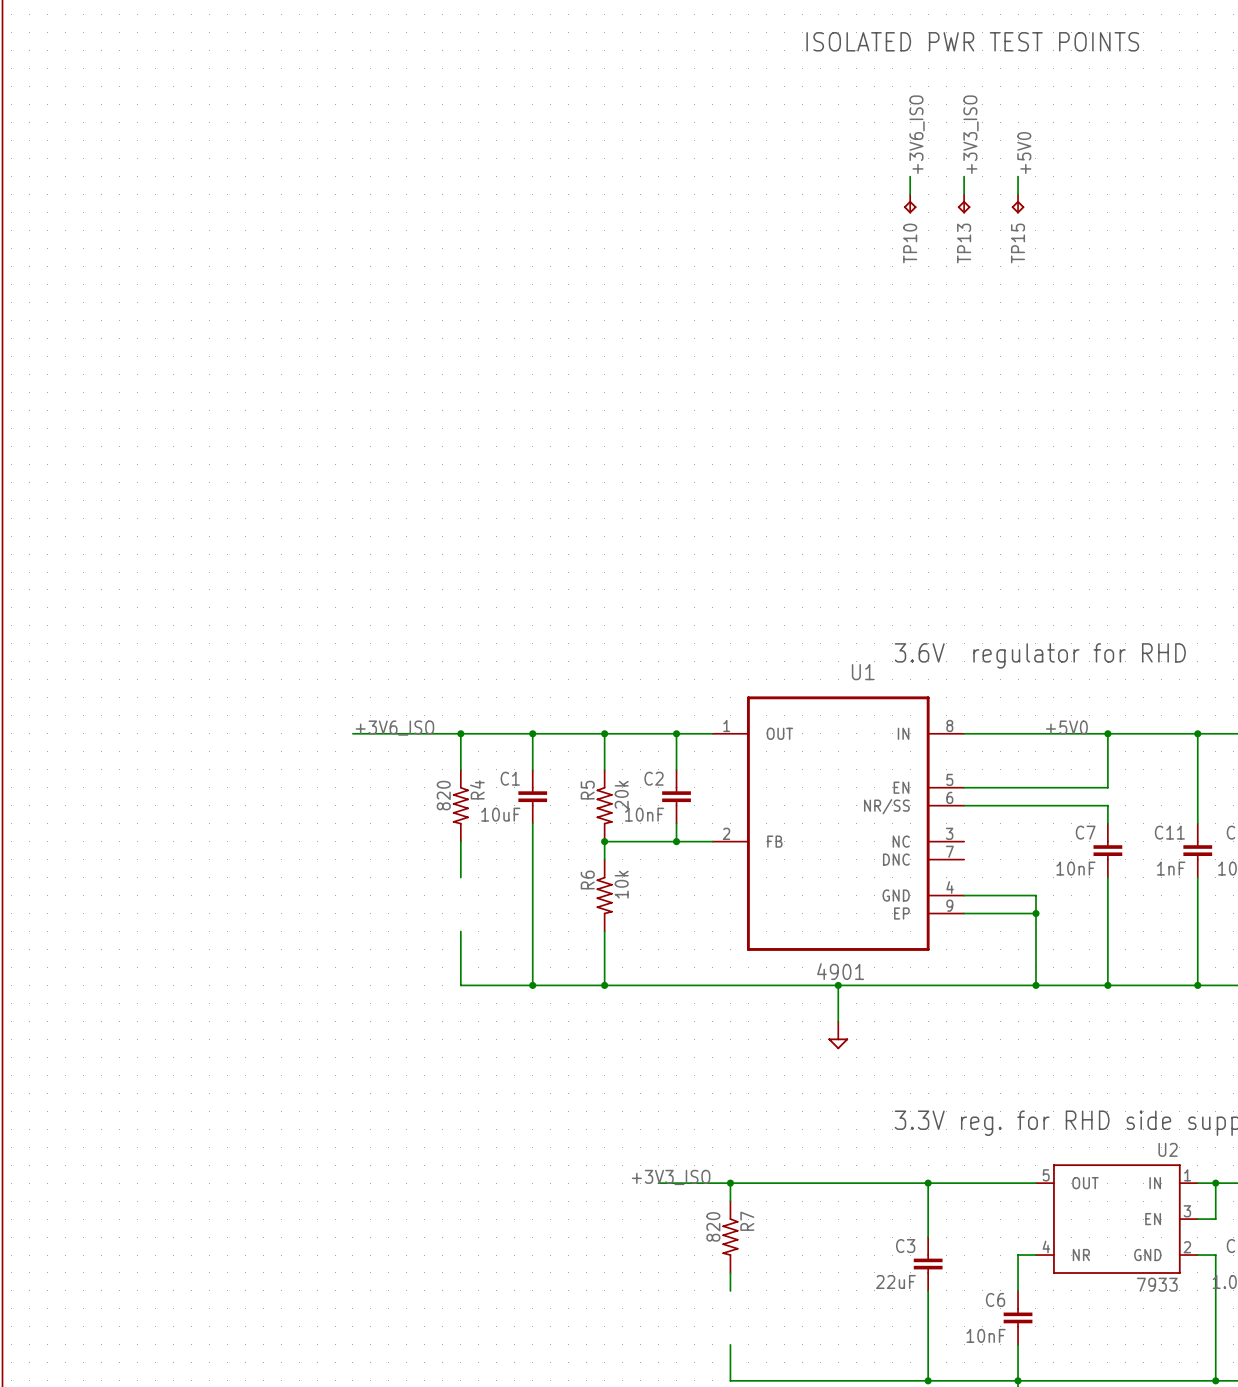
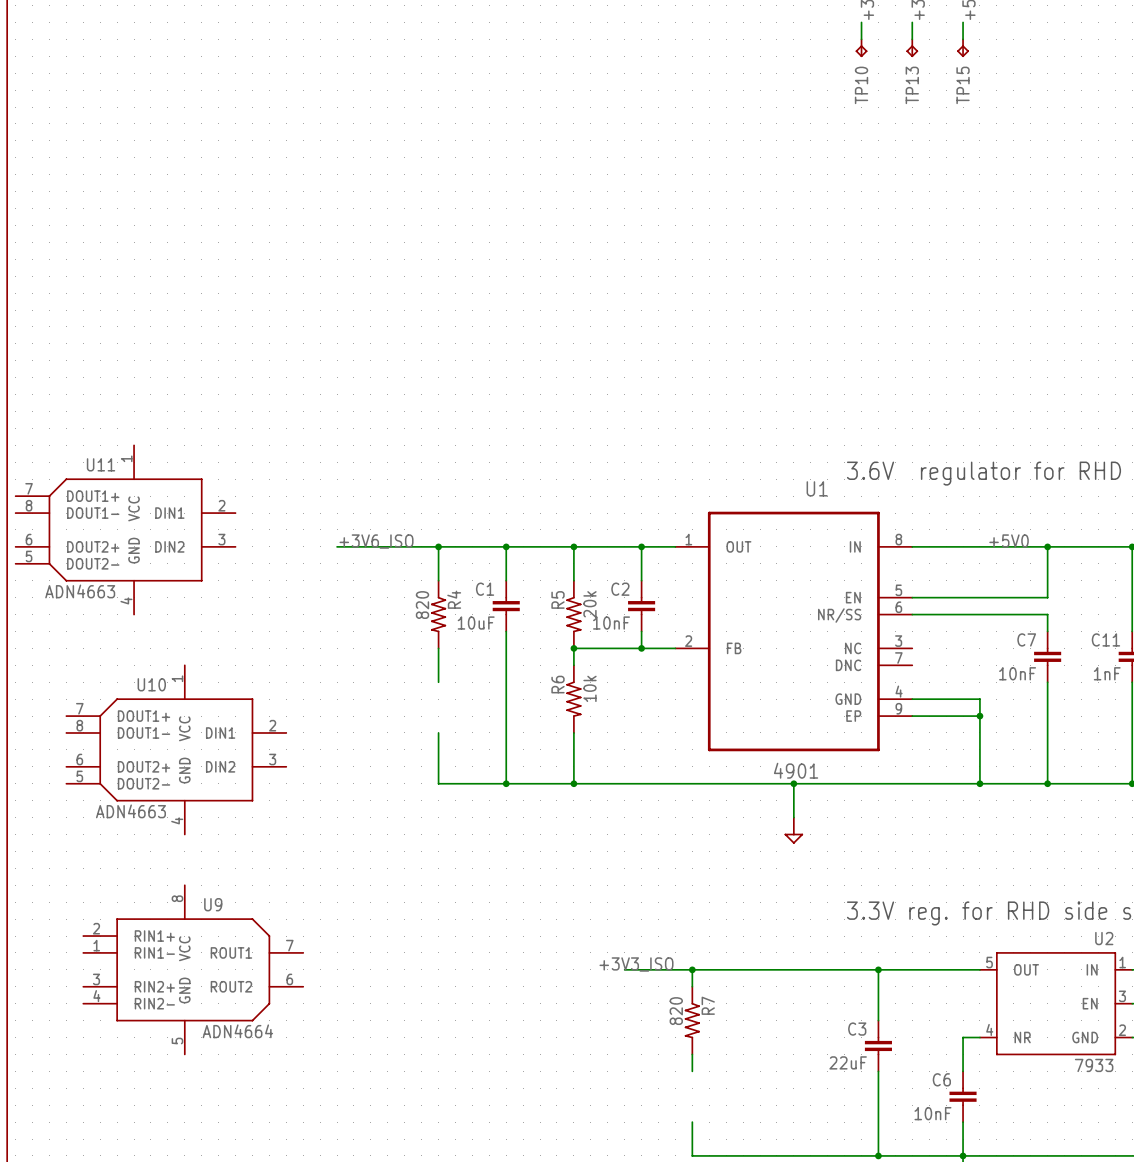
U11: none -> ADN4663 (125, 529)
U10: none -> ADN4663 (176, 749)
U9: none -> ADN4664 (193, 969)

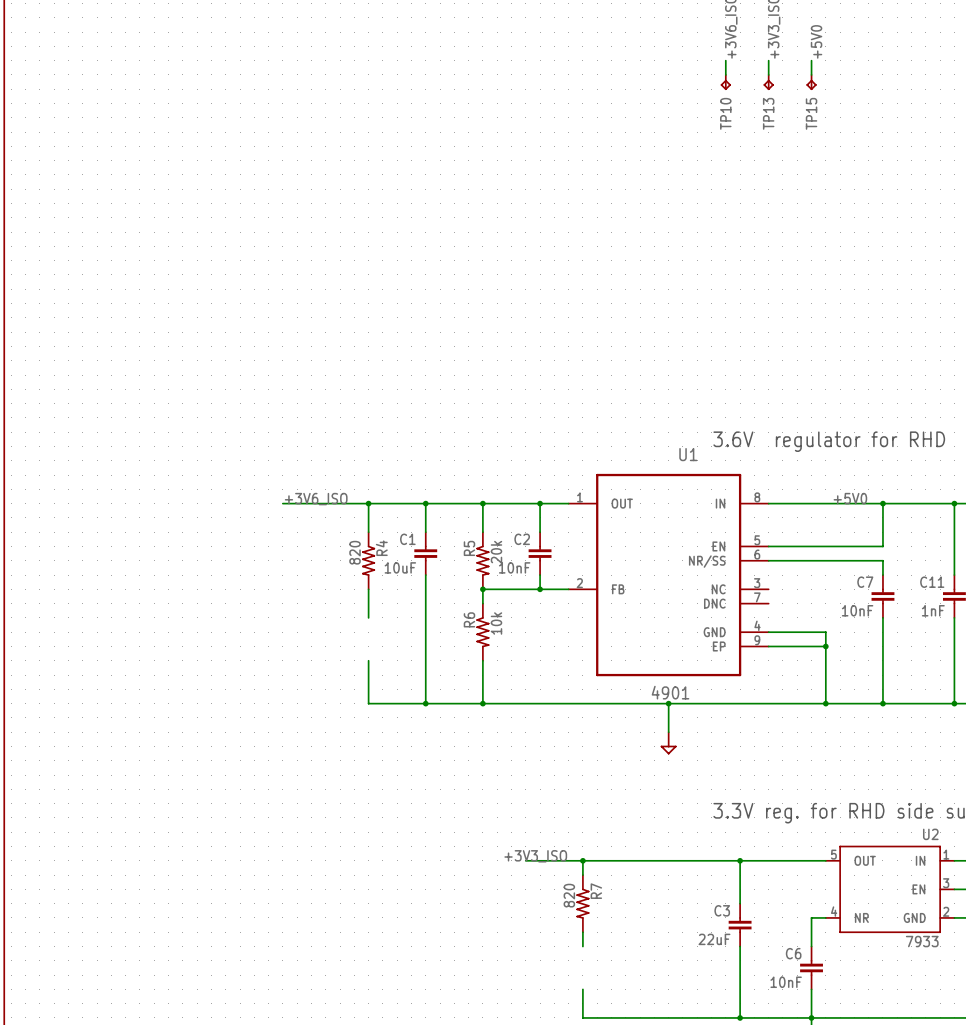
U11: ADN4663 (125, 529) -> none
U10: ADN4663 (176, 749) -> none
U9: ADN4664 (193, 969) -> none

